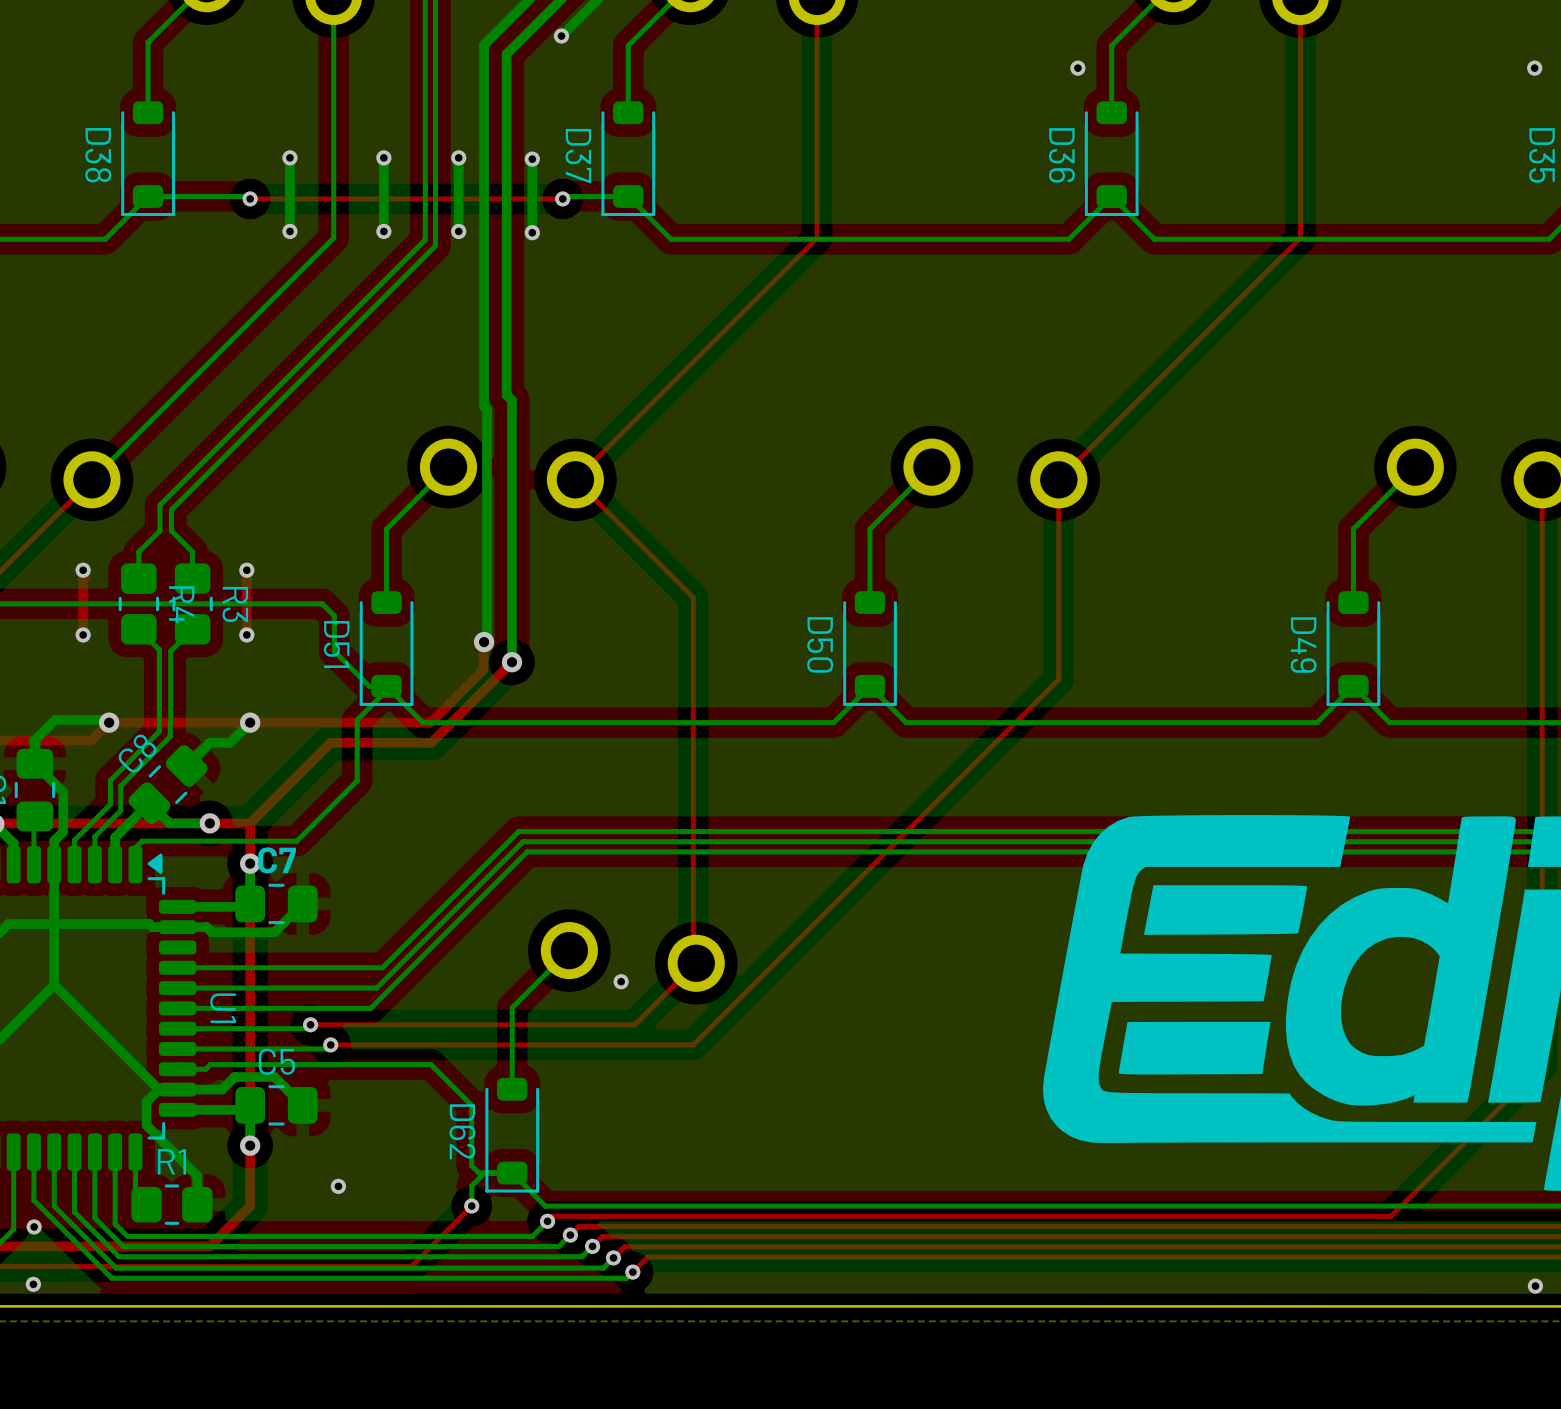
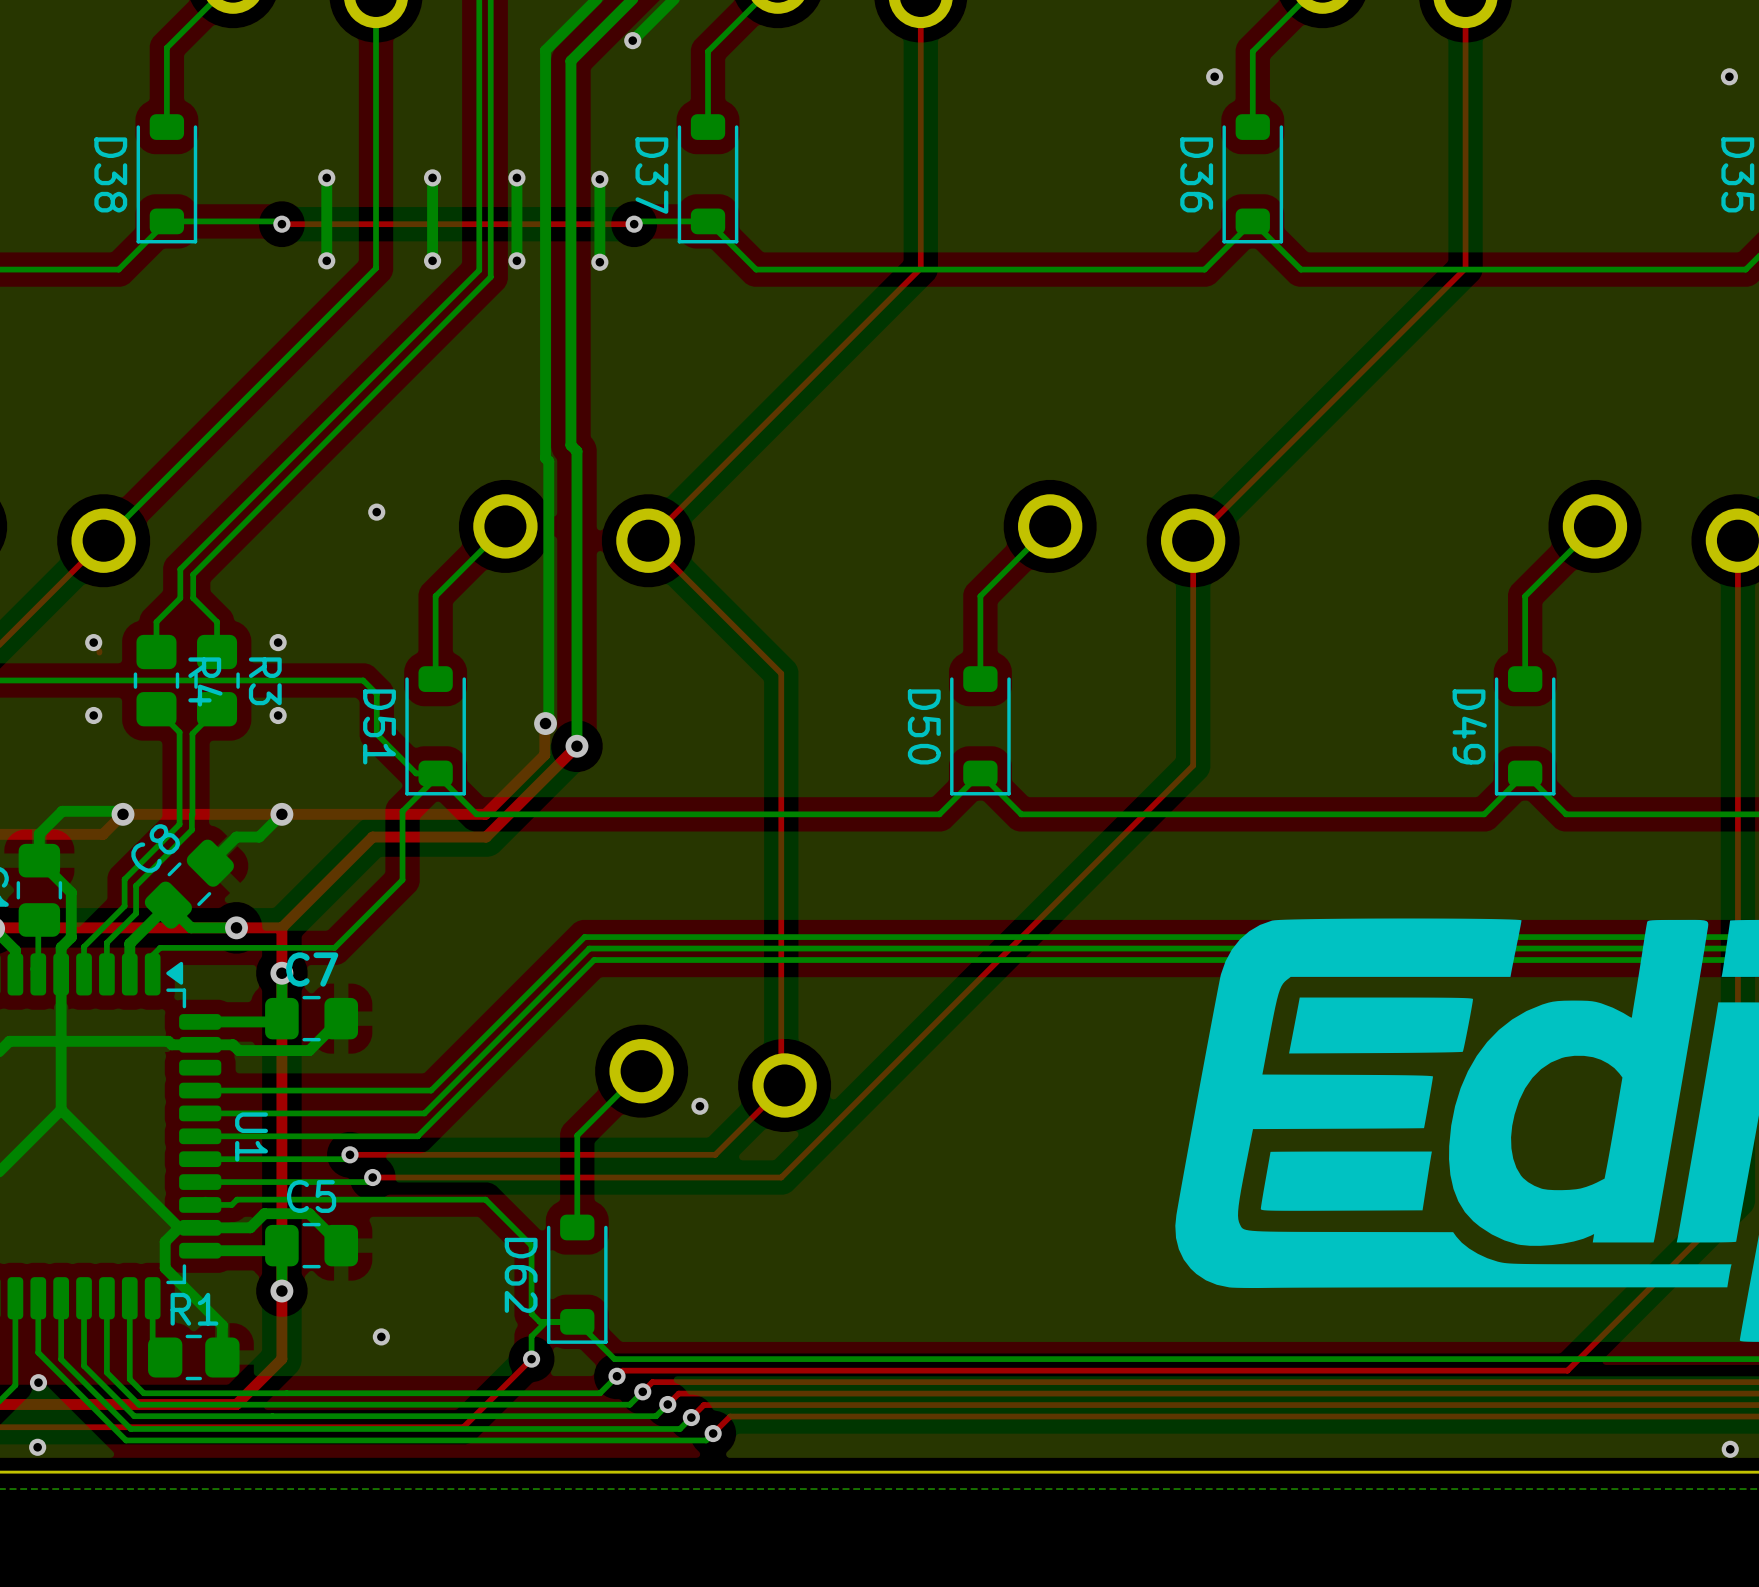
via: none -> (376, 512)
top track: (83, 570) (83, 634) -> none
top track: (246, 570) (246, 634) -> none

